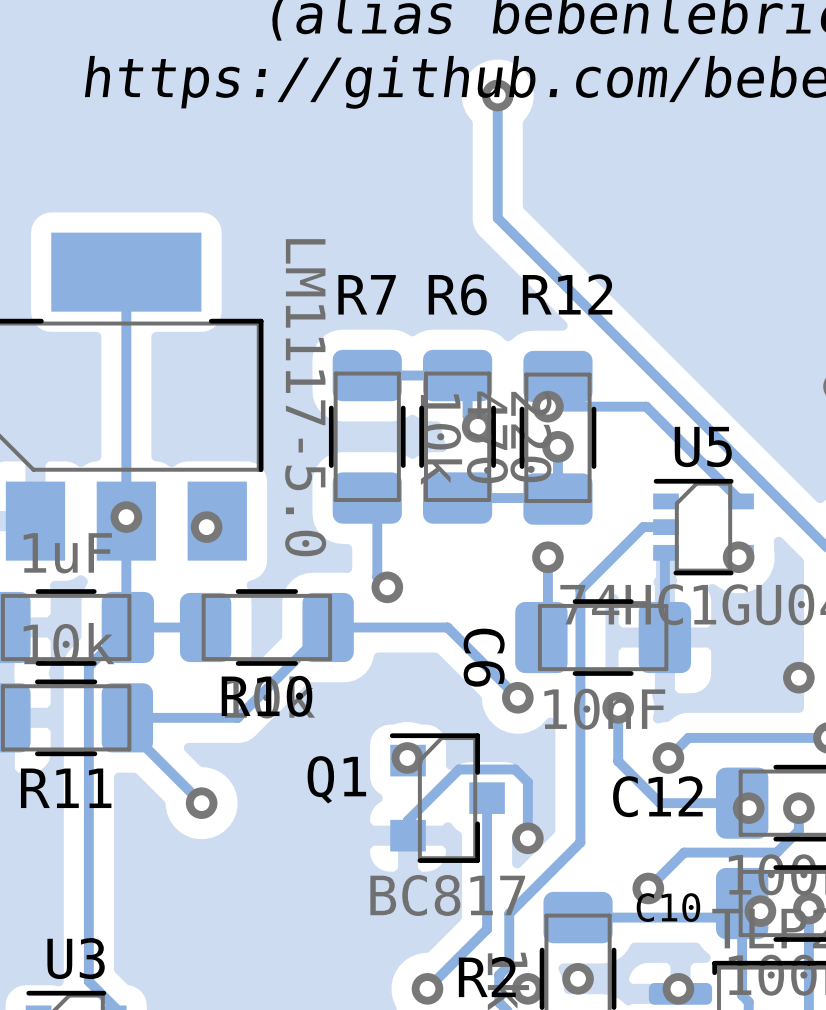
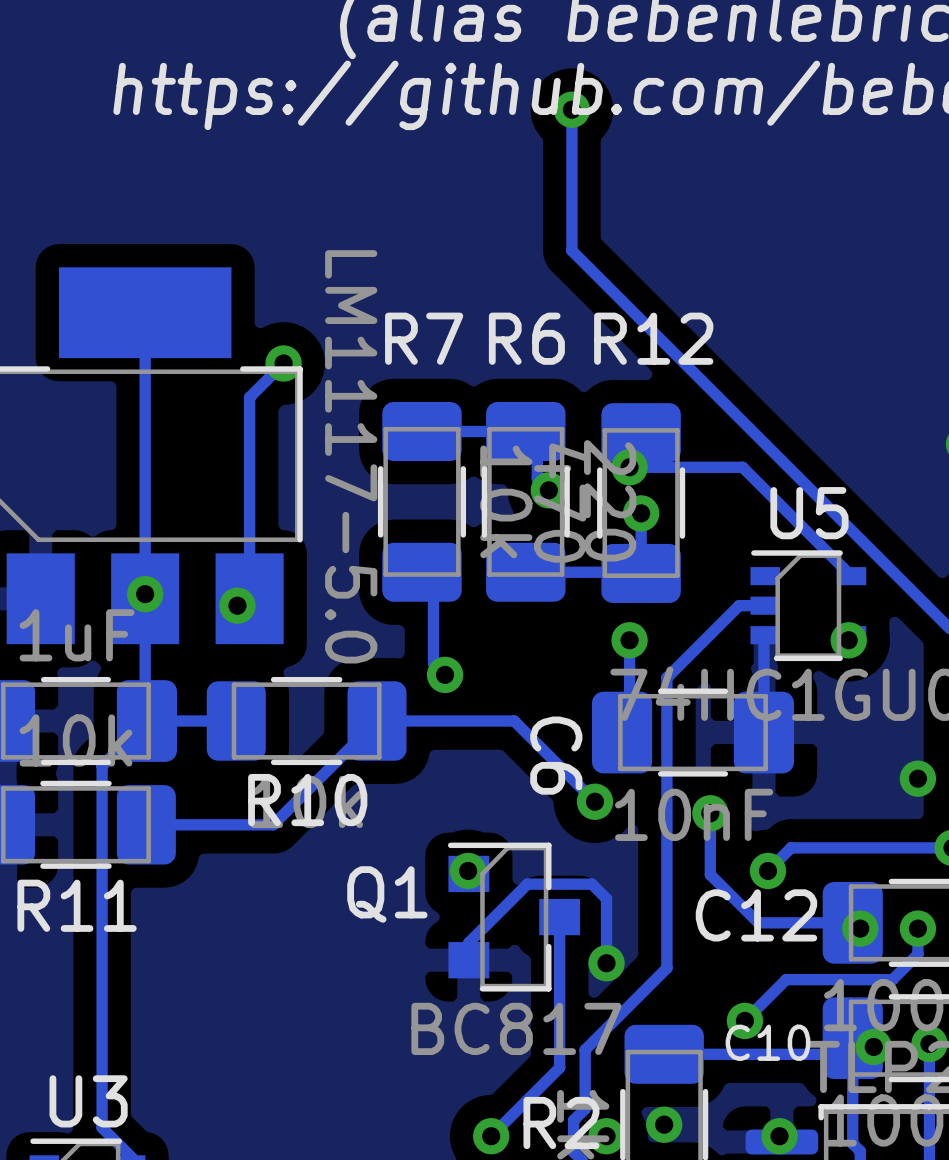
track: none -> (283, 363) (249, 397) (249, 598)
via: none -> (283, 363)
track: (127, 717) (127, 728) (201, 803) -> none
via: (201, 803) -> none

